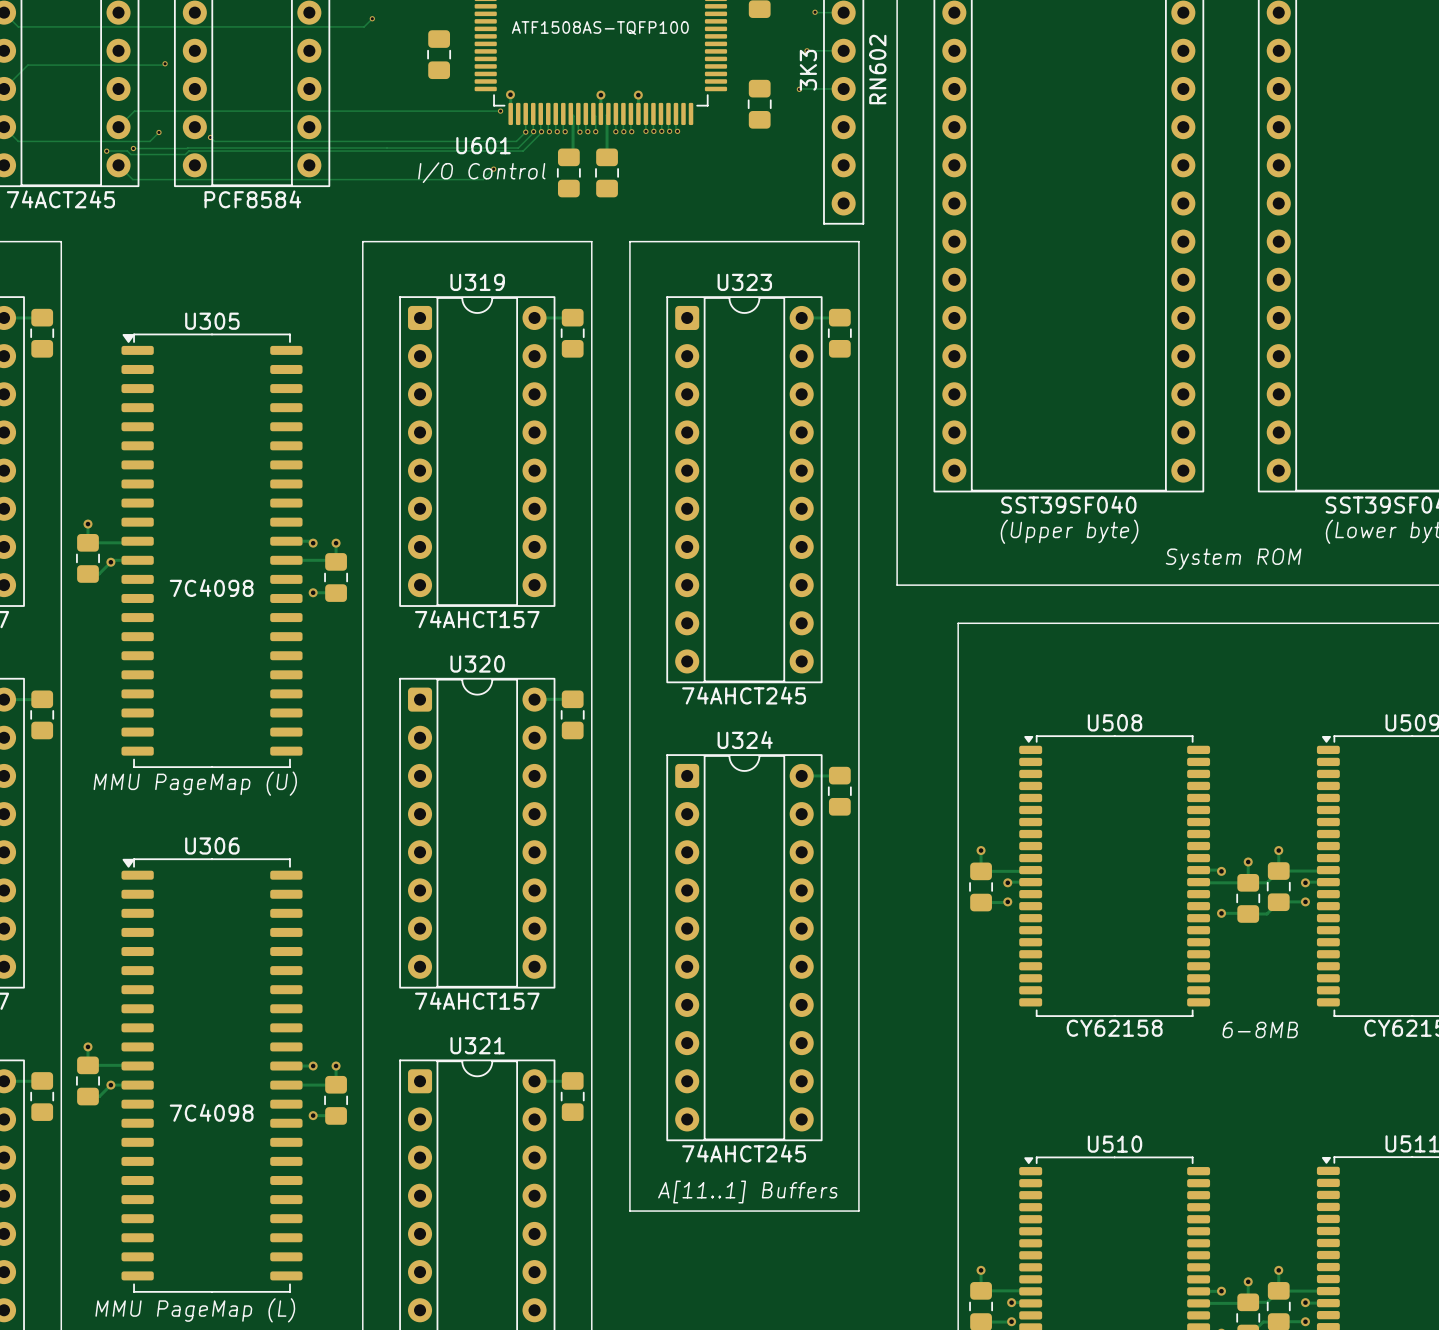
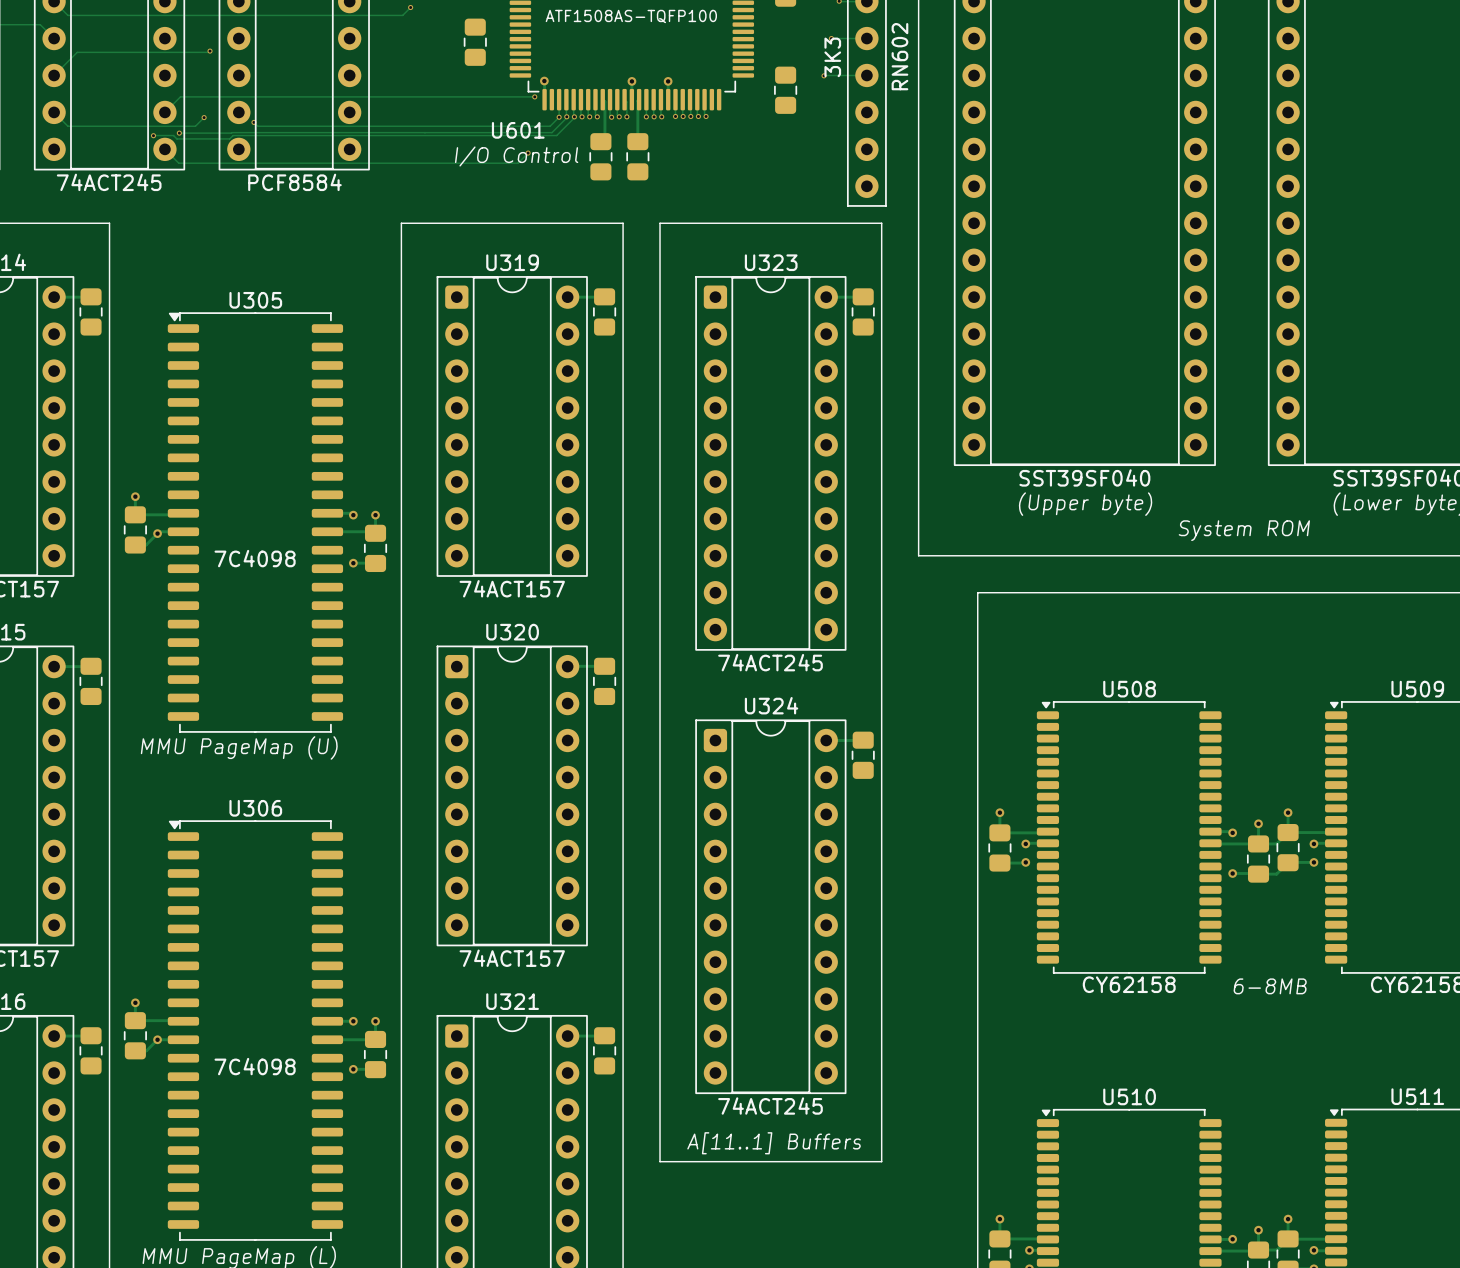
U319 value: 74AHCT157 (477, 619) -> 74ACT157 (512, 588)
U323 value: 74AHCT245 (744, 695) -> 74ACT245 (770, 662)
U320 value: 74AHCT157 (477, 1000) -> 74ACT157 (512, 958)
U324 value: 74AHCT245 (744, 1153) -> 74ACT245 (770, 1106)

